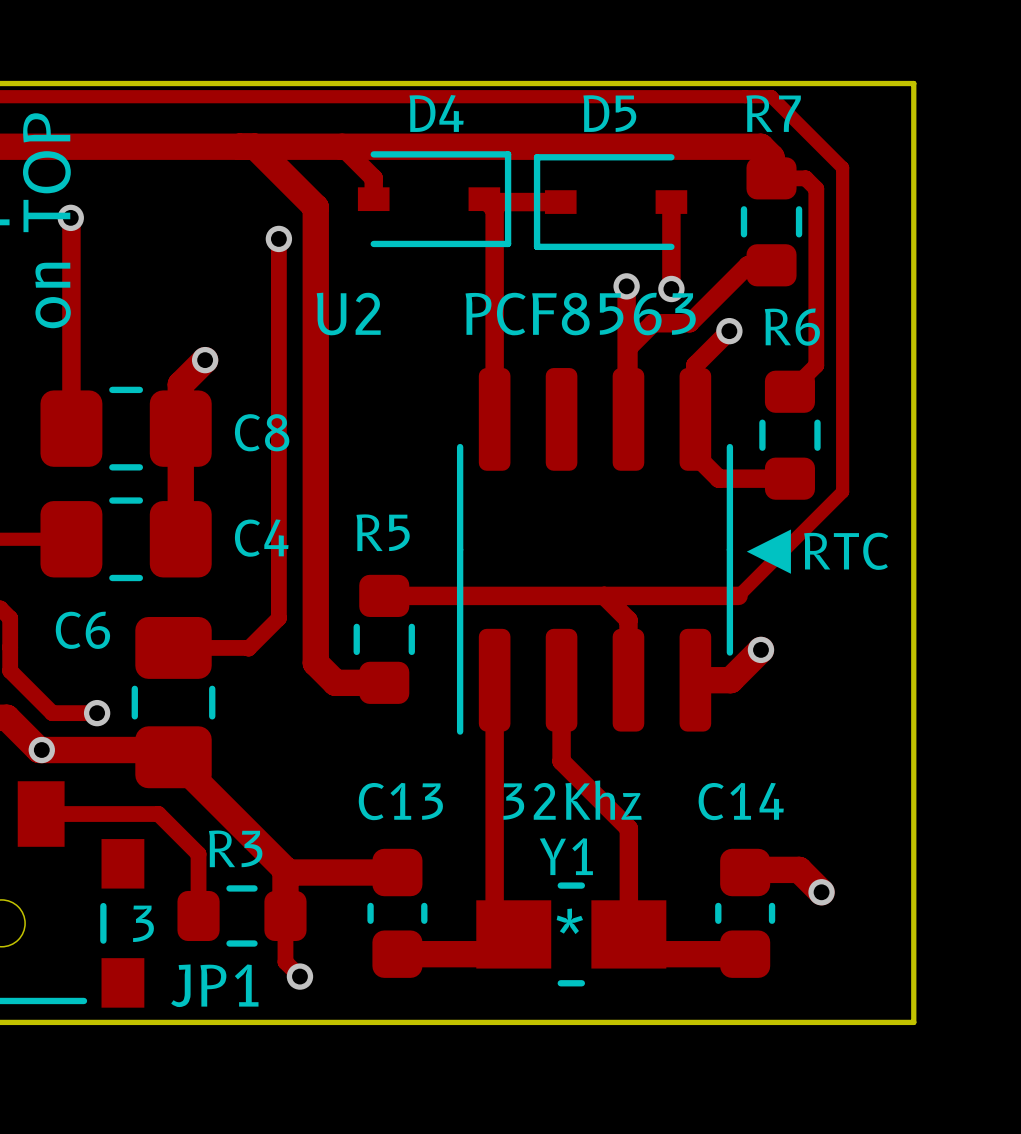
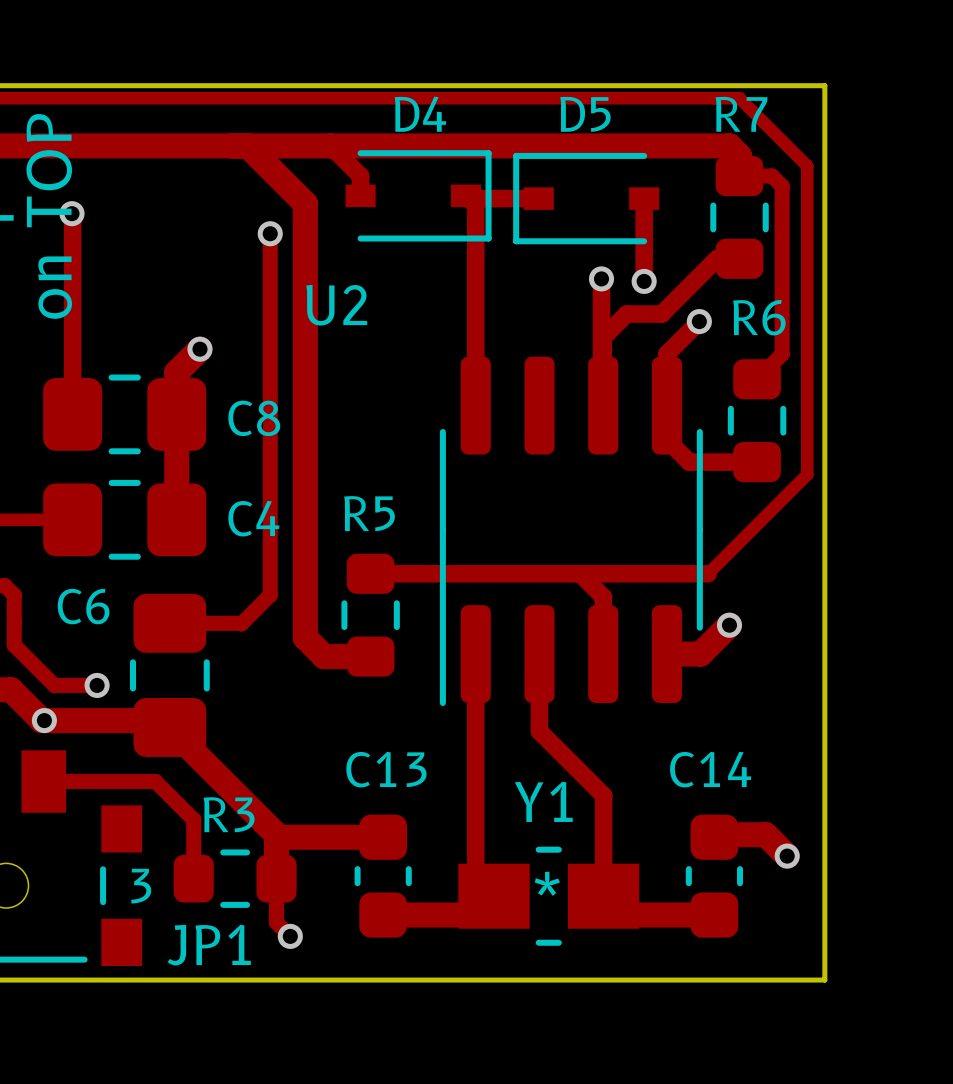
board edge: (861, 83) (913, 83) (913, 1022) (861, 1022) -> (824, 85) (824, 980)
text: PCF8563 (580, 314) -> none
text: ◀ (768, 551) -> none
text: RTC (846, 551) -> none
text: 32Khz (572, 800) -> none
Y1 name position: Y1 (566, 856) -> Y1 (543, 801)

